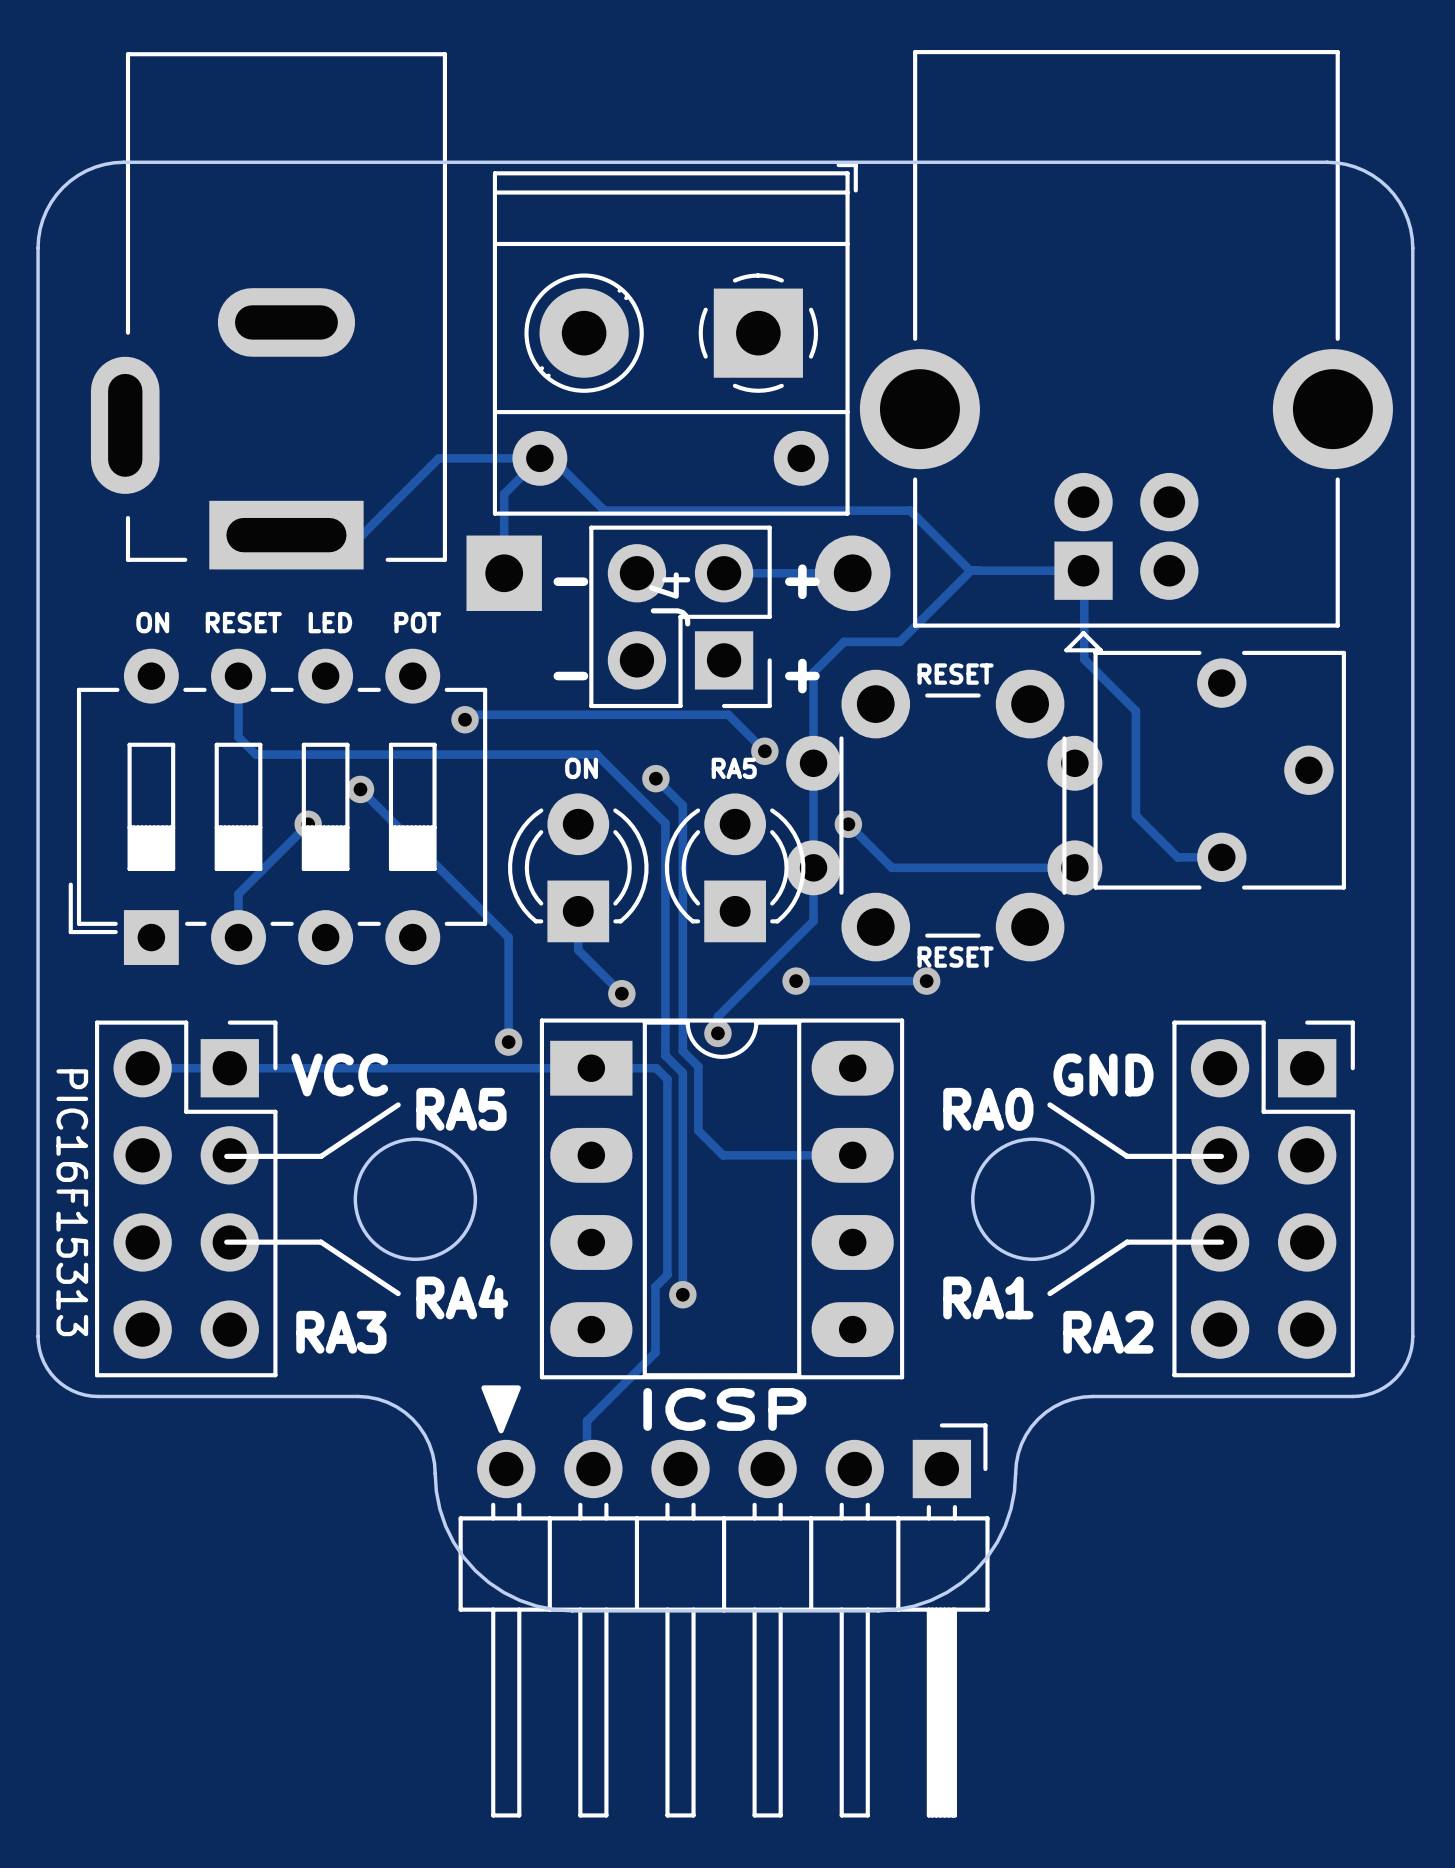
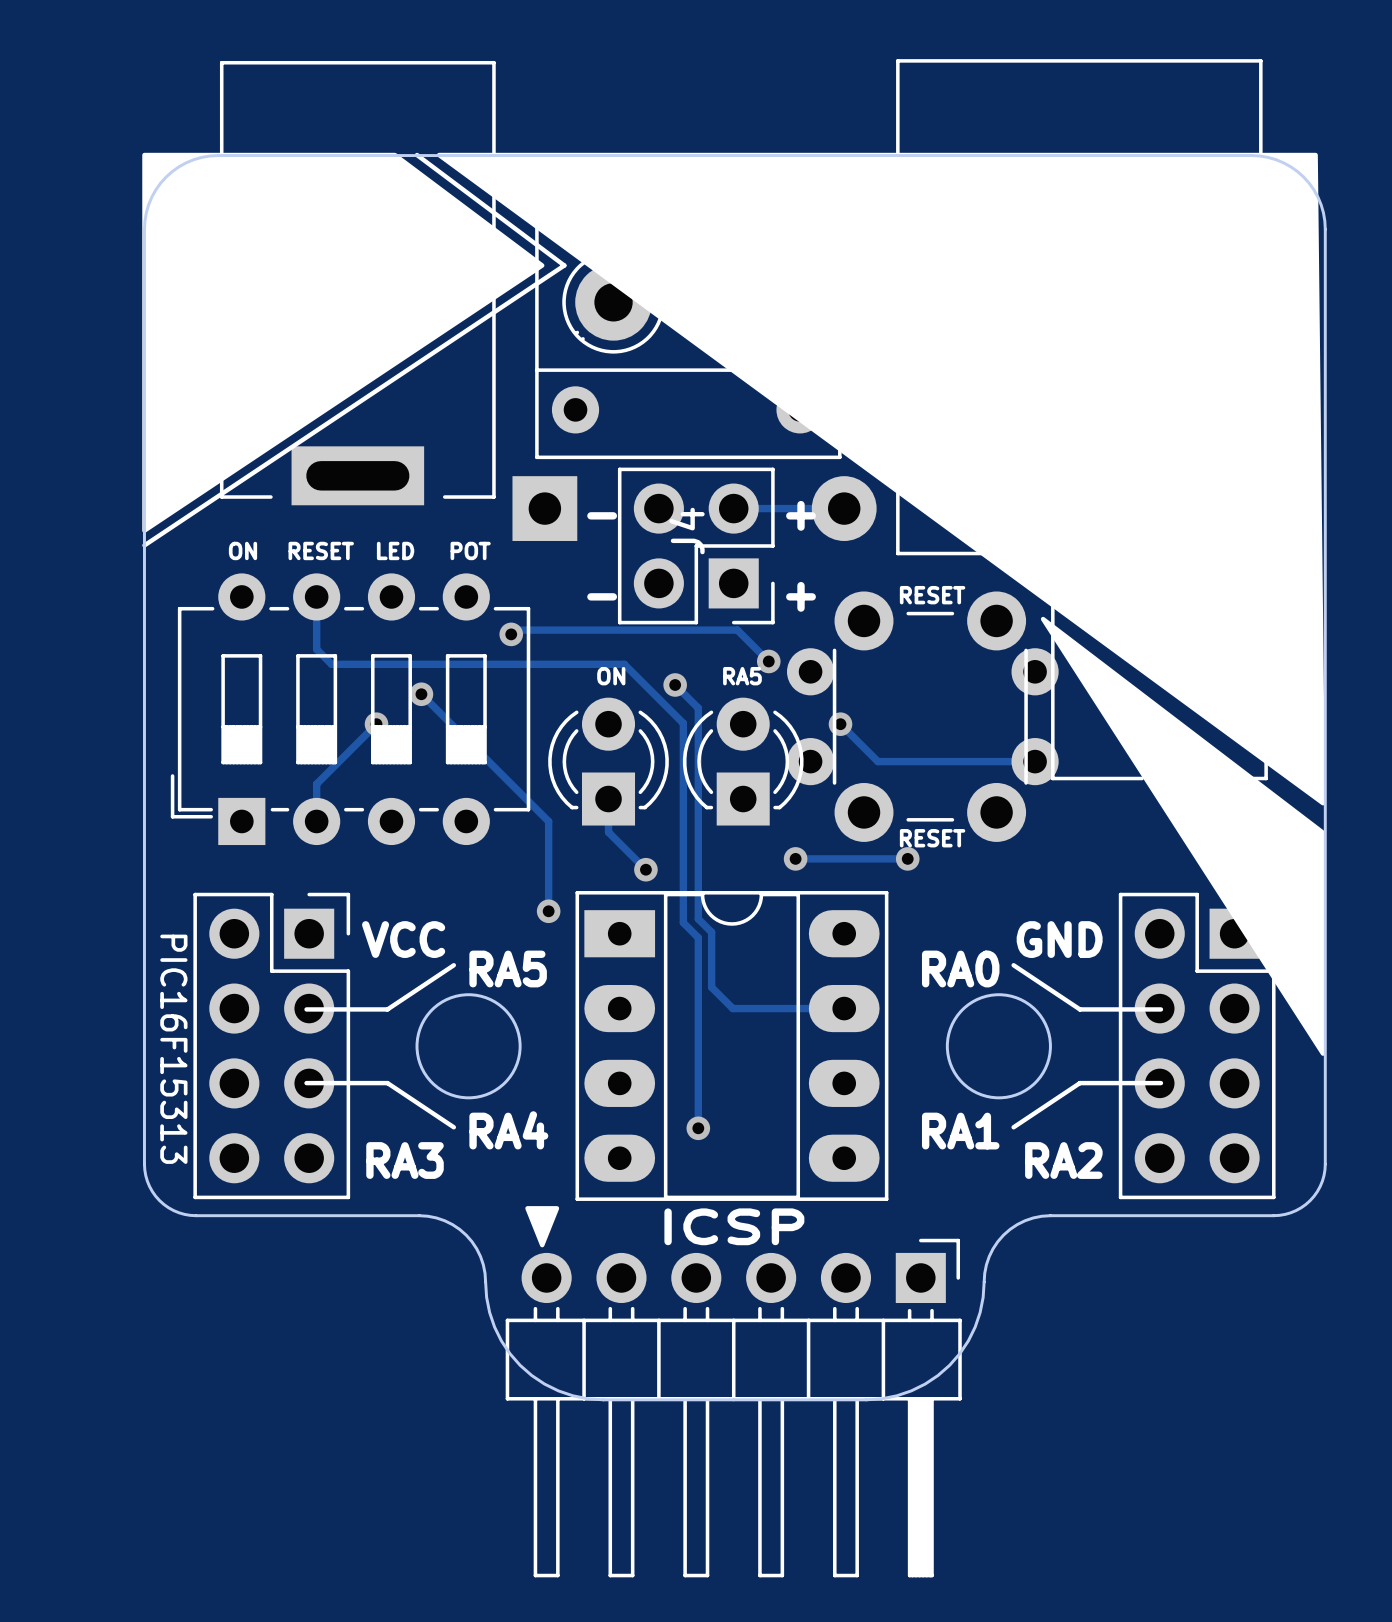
drawing: none -> [142, 152, 1326, 1056]
line: none -> (417, 155) (564, 265) (144, 545)
track: (539, 458) (504, 494) (504, 573) -> none
track: (286, 535) (362, 535) (438, 458) (552, 458) (604, 510) (910, 510) (970, 570) (1084, 570) (1084, 659) (1135, 711) (1135, 815) (1177, 857) (1221, 857) -> none
track: (971, 570) (899, 641) (844, 641) (813, 672) (813, 921) (717, 1016) (717, 1033) -> none
via: (717, 1033) -> none
track: (142, 1068) (656, 1068) (667, 1079) (667, 1275) (655, 1286) (655, 1352) (587, 1421) (587, 1469) -> none

